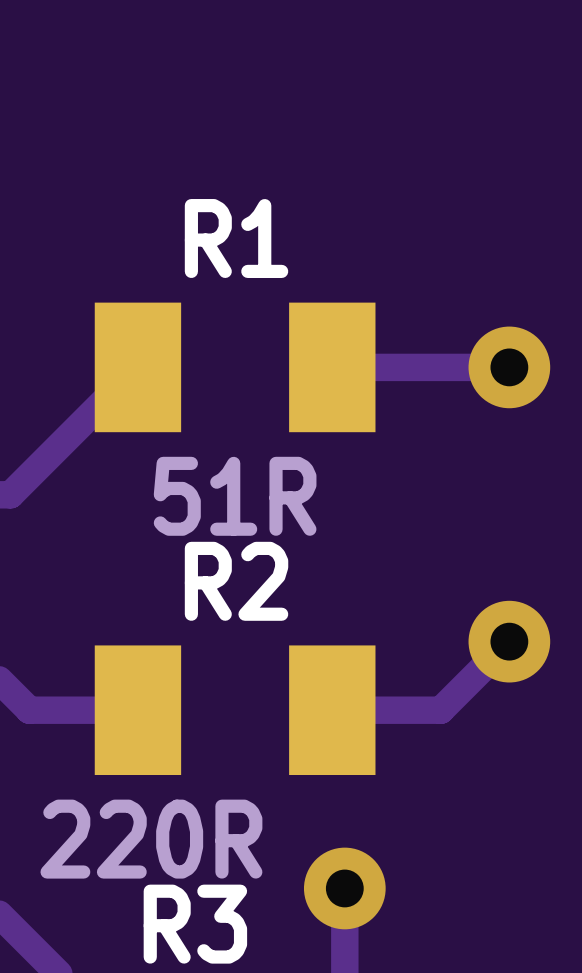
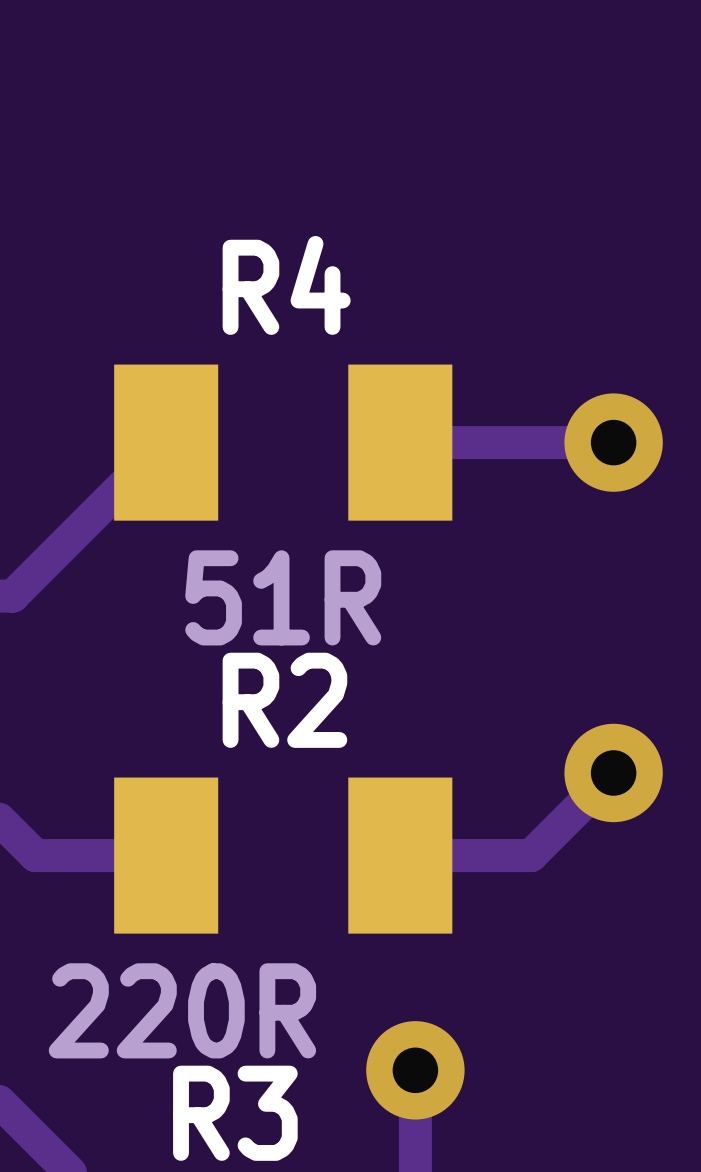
R1 name: R1 (236, 238) -> R4 (286, 285)

